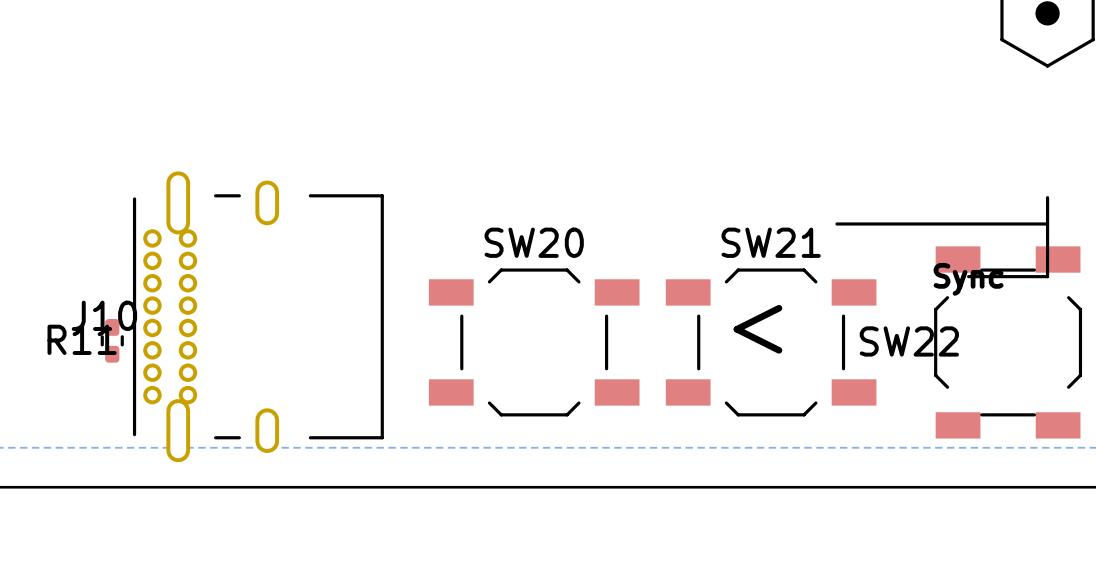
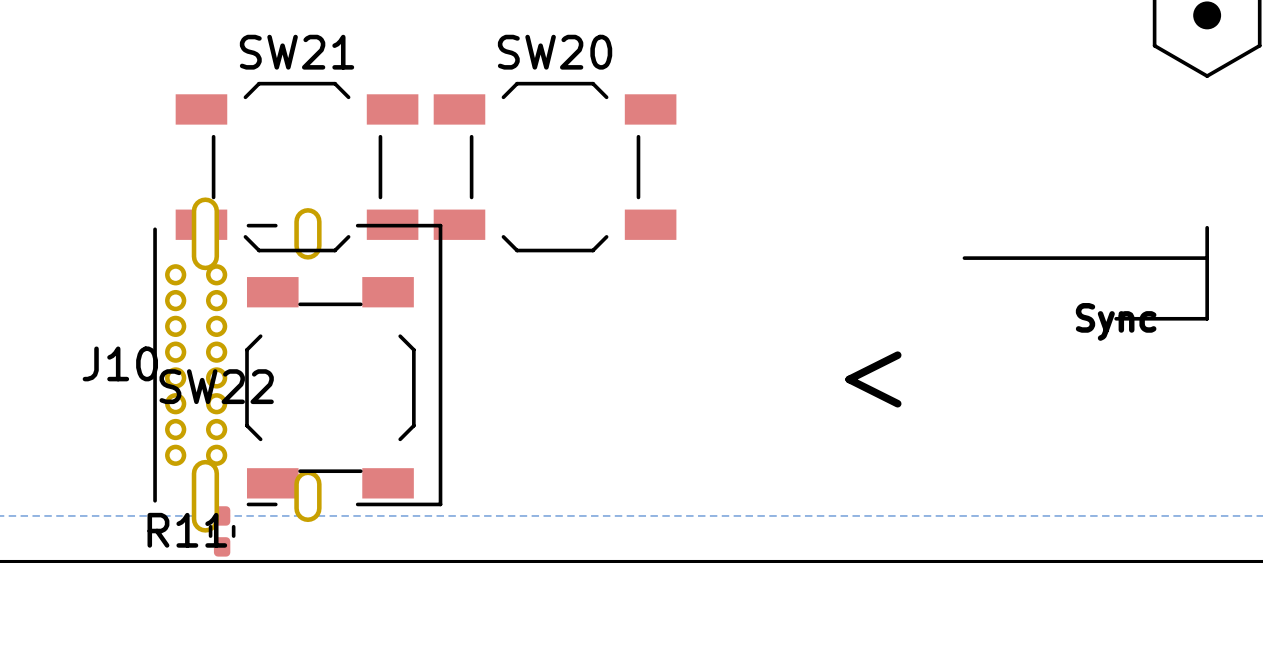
R11 position: (112, 340) -> (222, 531)
SW20 position: (534, 342) -> (555, 167)
SW21 position: (771, 342) -> (297, 167)
SW22 position: (1008, 342) -> (330, 387)

